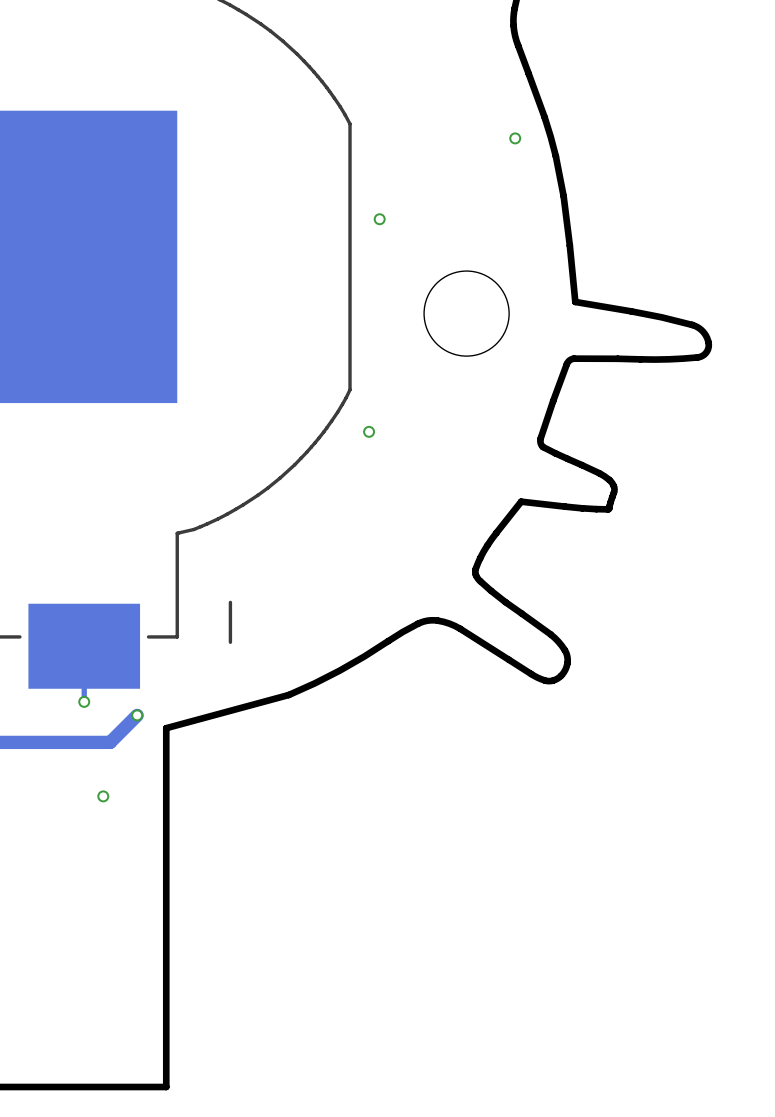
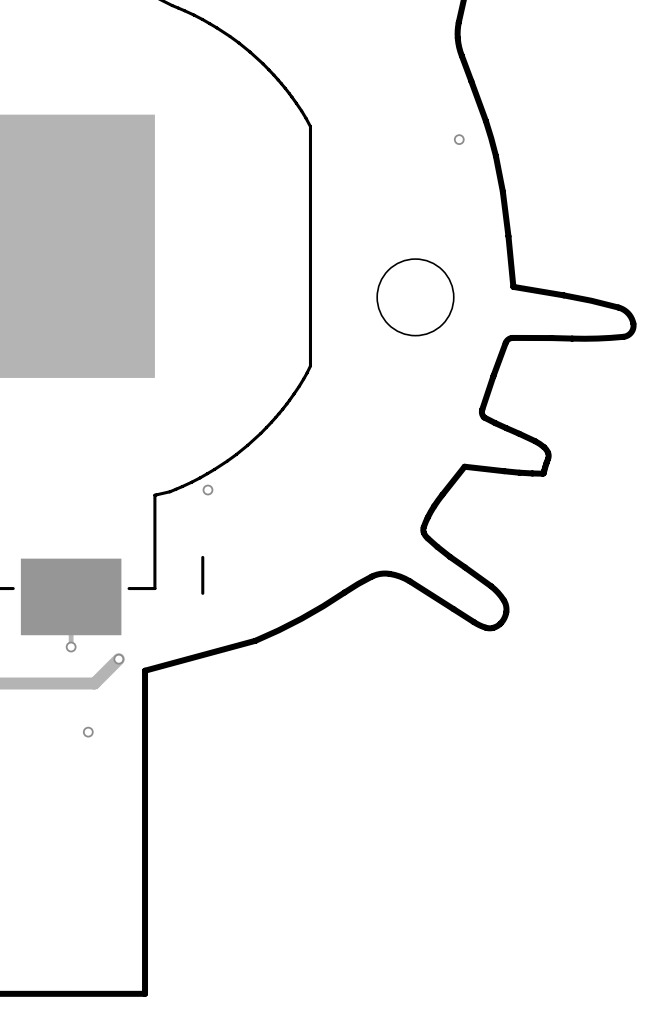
via: (379, 219) -> none
via: (369, 431) -> none
via: none -> (207, 490)

